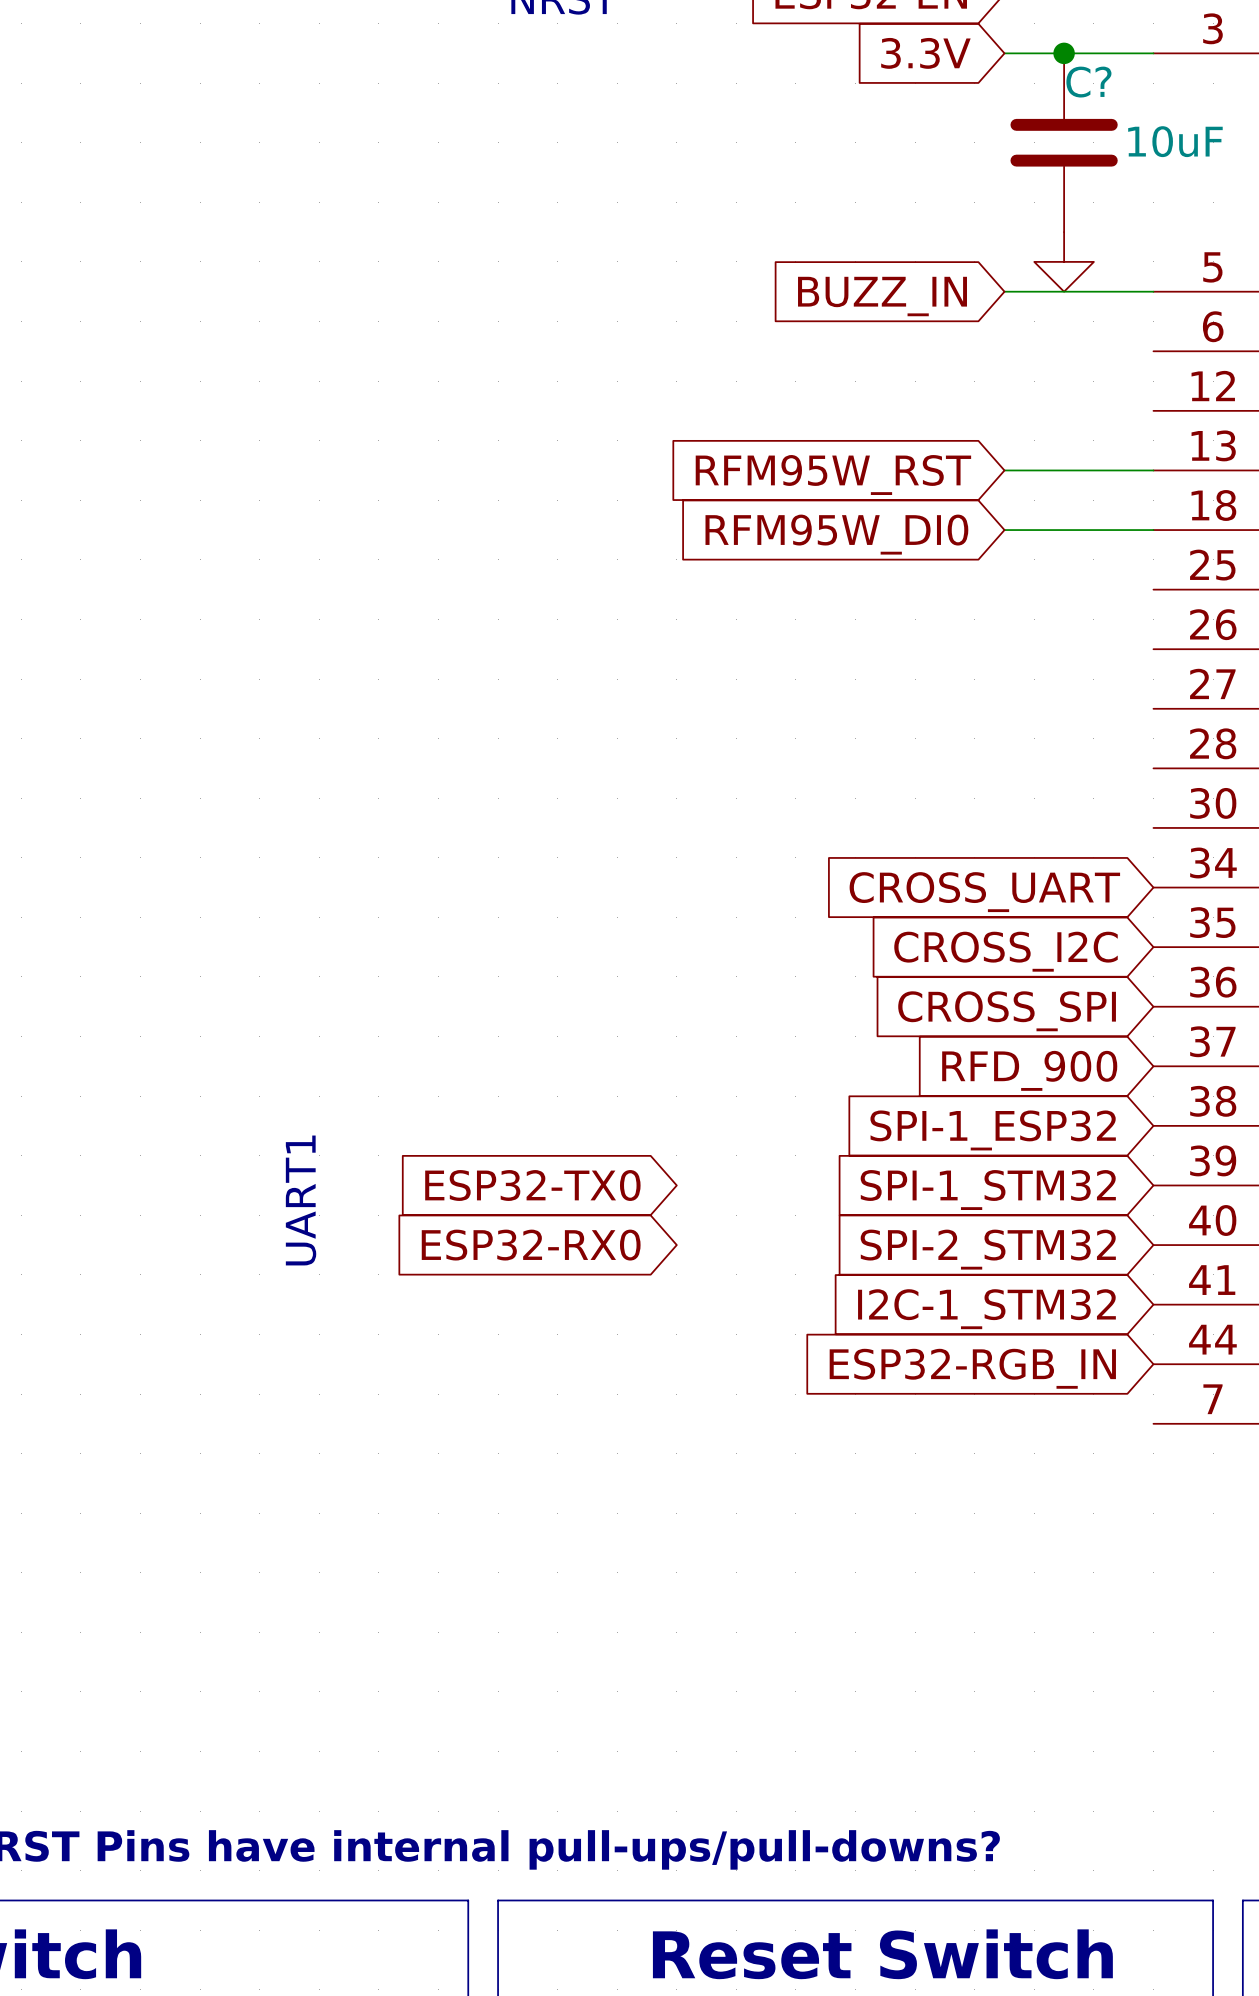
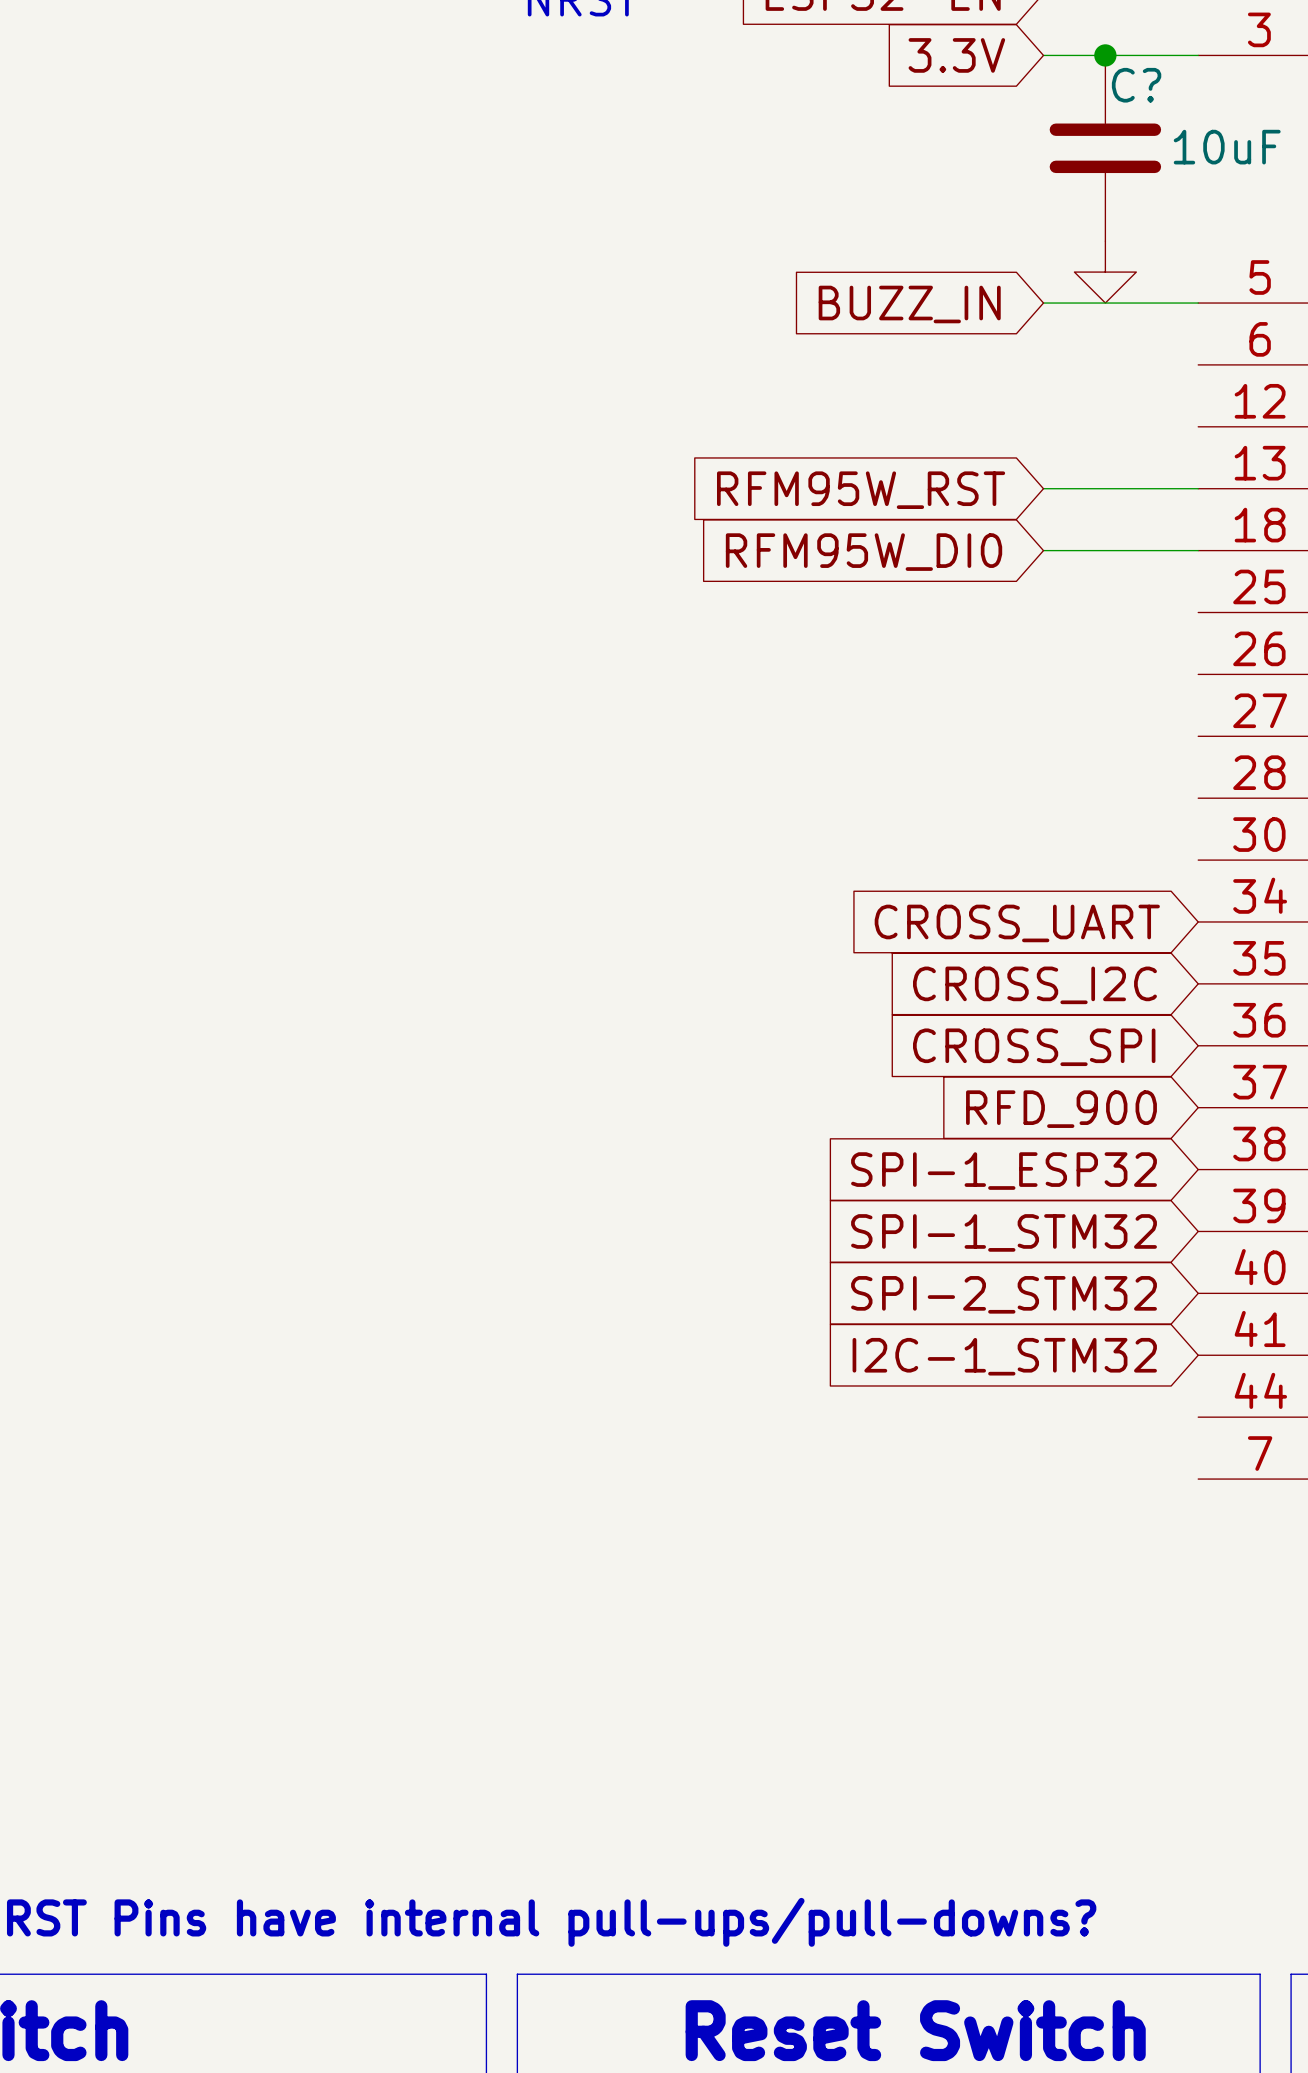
global label: ESP32-TX0 (532, 1185) -> none
text: UART1 (301, 1200) -> none
global label: ESP32-RX0 (531, 1245) -> none
global label: ESP32-RGB_IN (972, 1368) -> none

